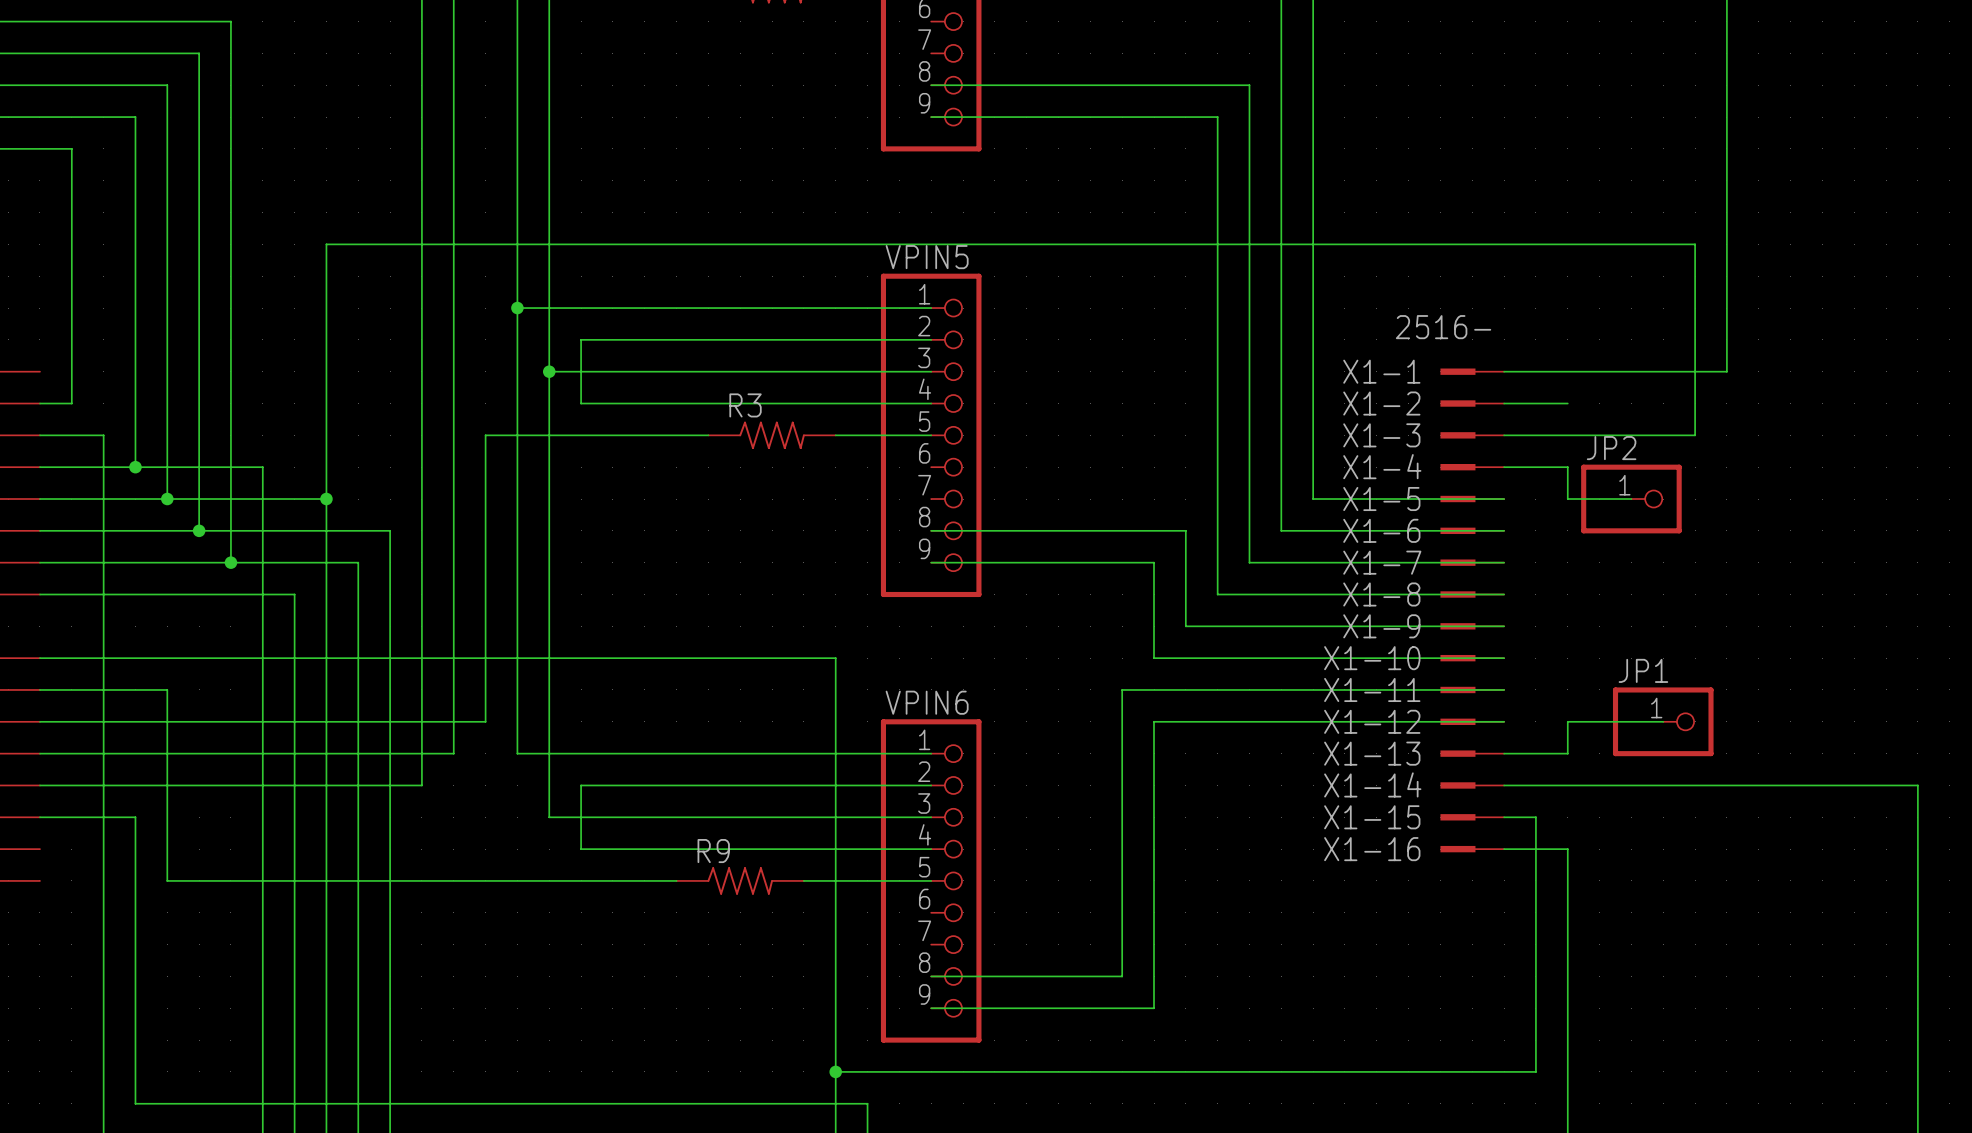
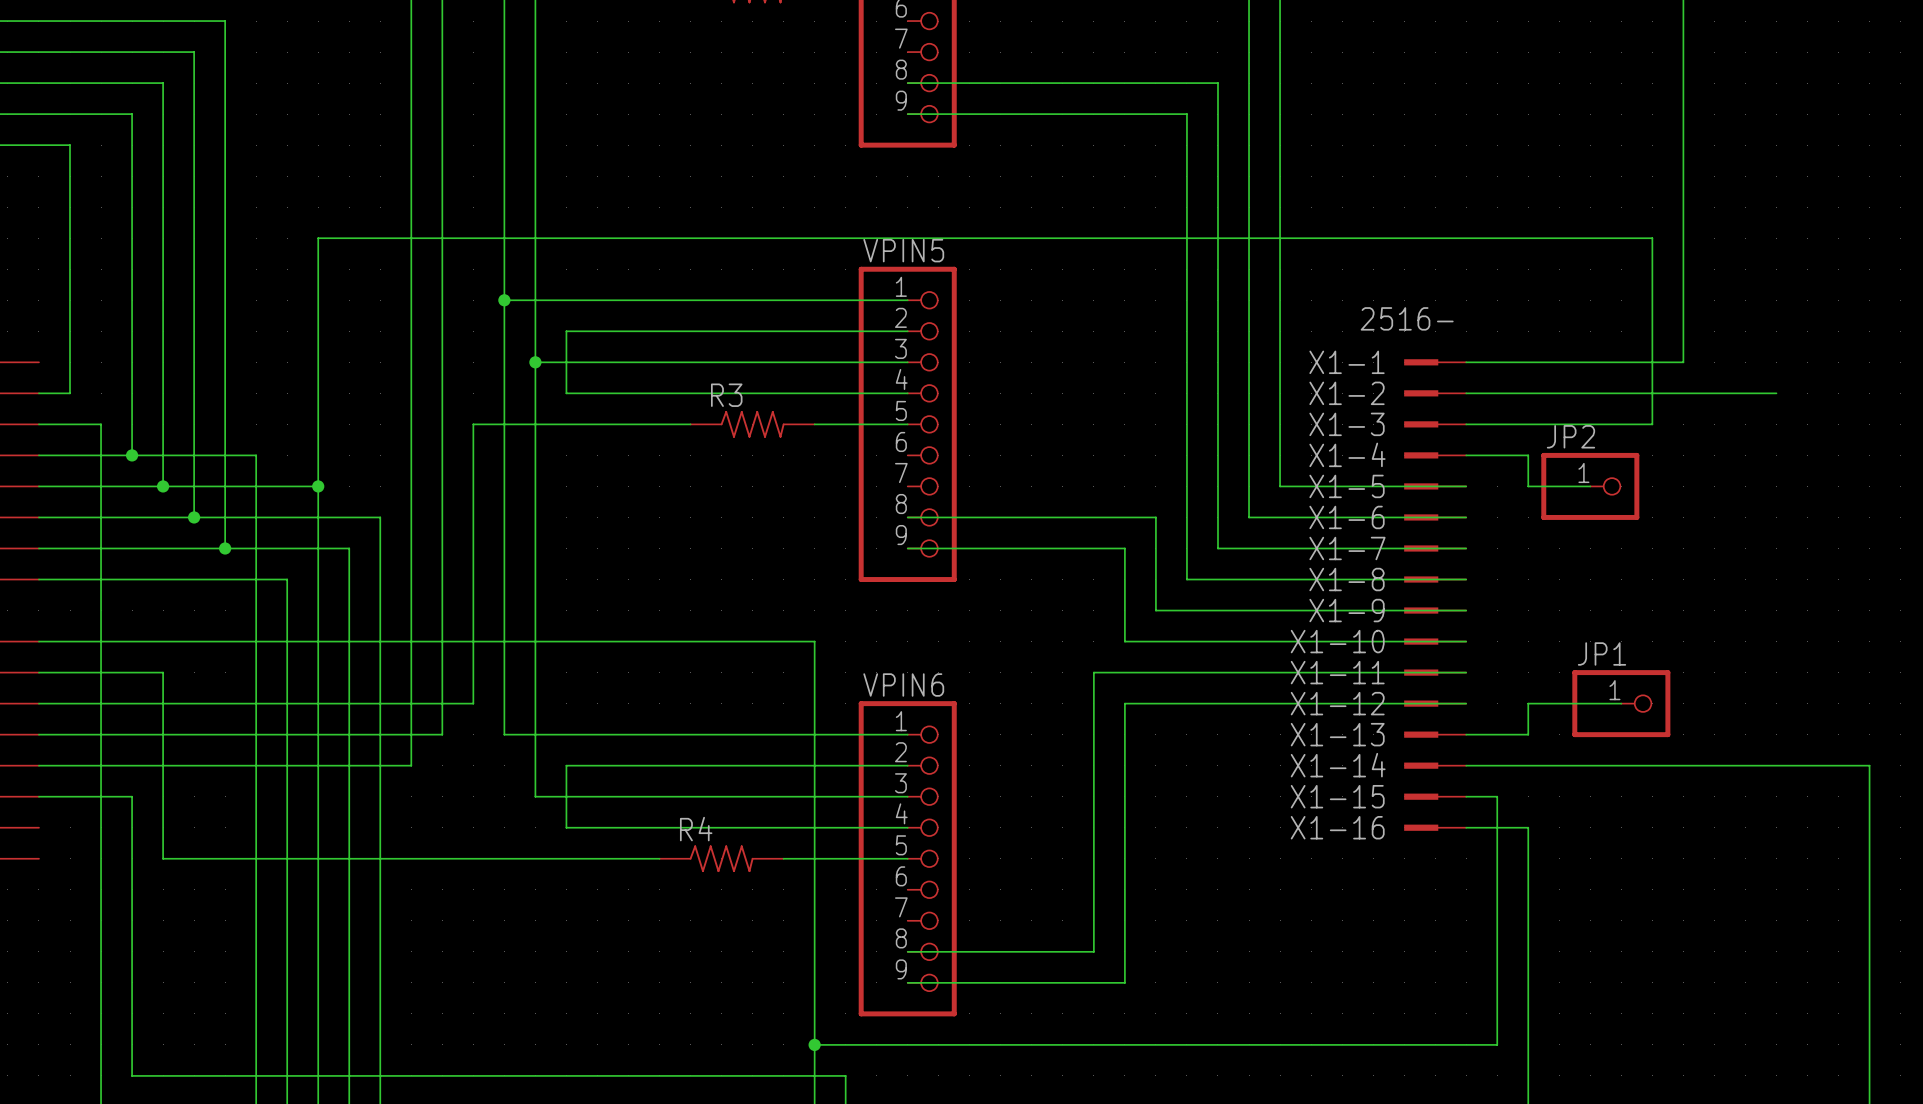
wire: none -> (1528, 393) (1776, 393)
R9 name: R9 (713, 851) -> R4 (696, 829)

